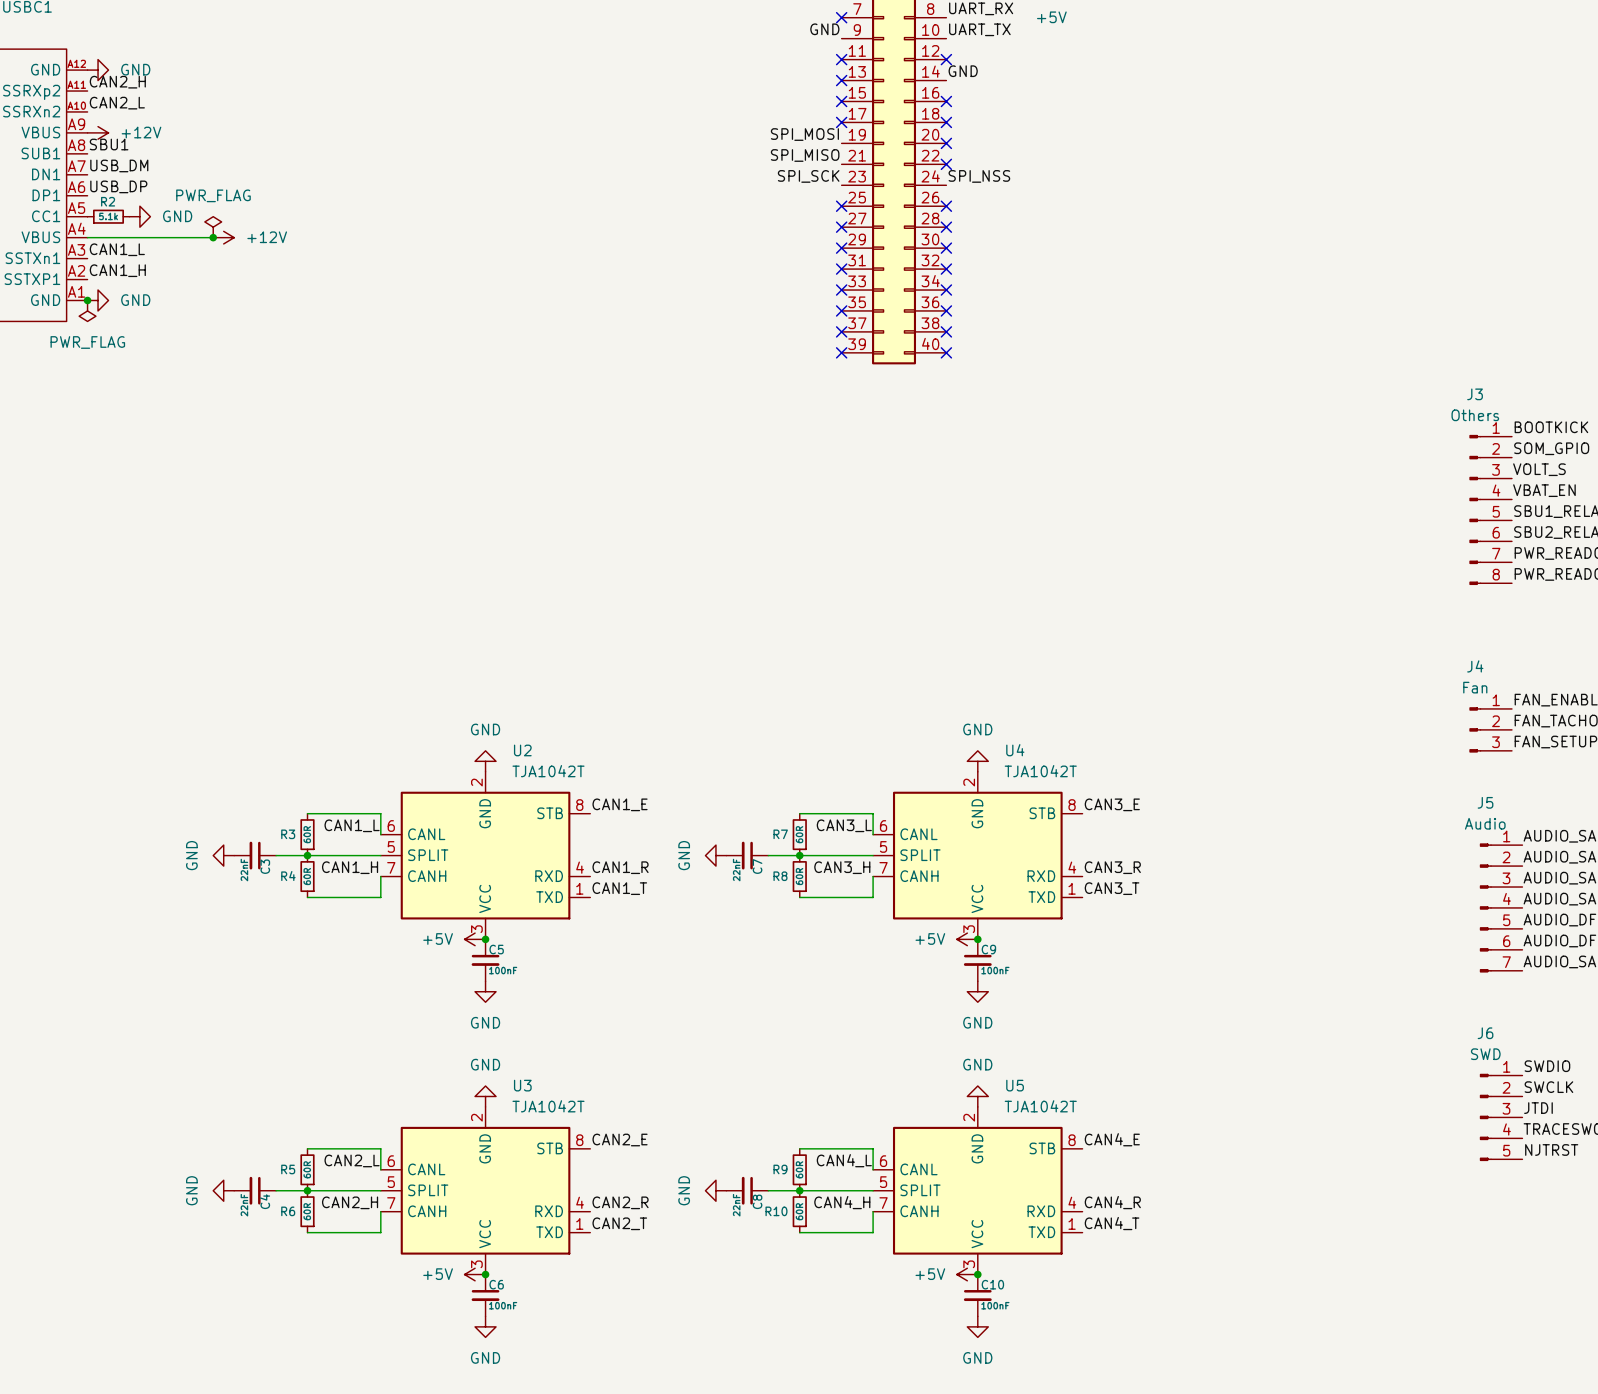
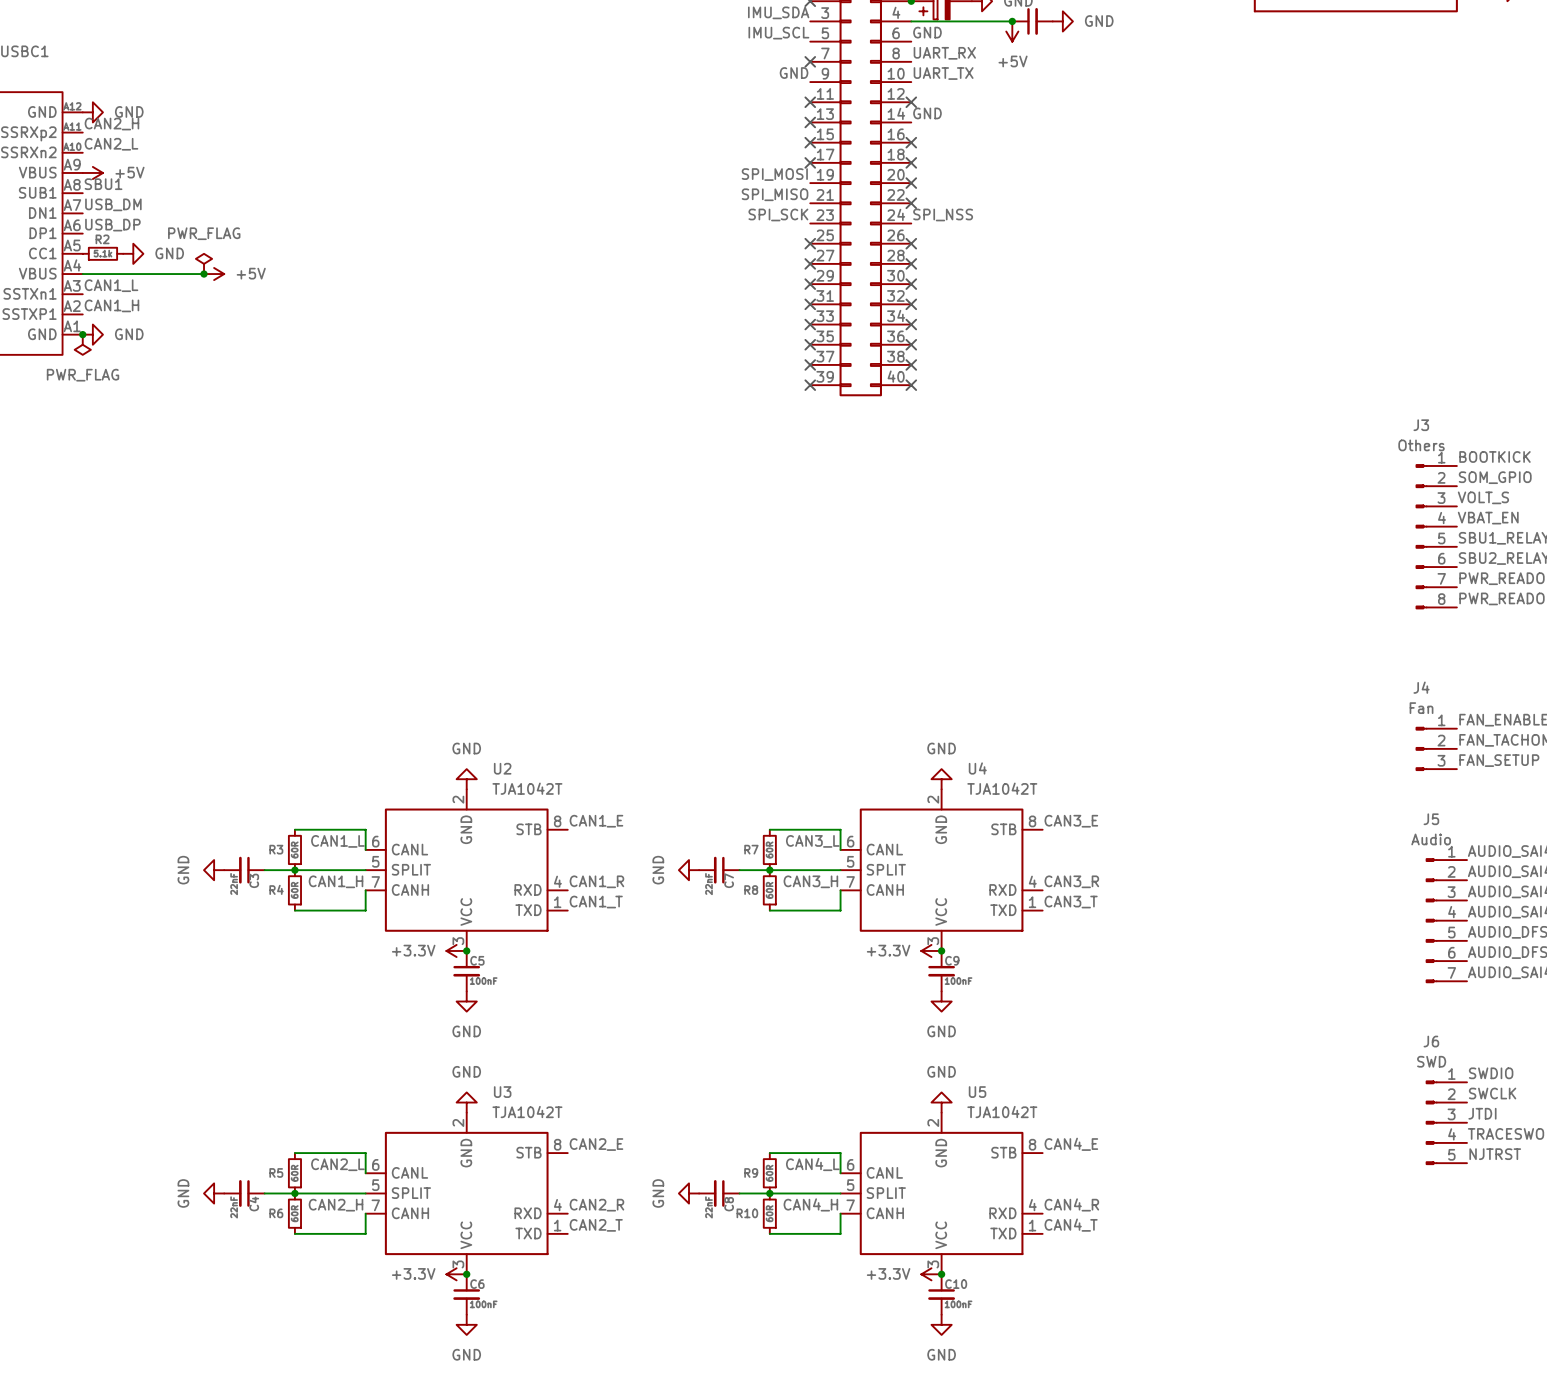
power symbol: +12V (98, 132) -> +5V (92, 172)
power symbol: +12V (223, 237) -> +5V (214, 274)
power symbol: +5V (475, 939) -> +3.3V (456, 950)
power symbol: +5V (967, 939) -> +3.3V (931, 950)
power symbol: +5V (475, 1274) -> +3.3V (456, 1274)
power symbol: +5V (967, 1274) -> +3.3V (931, 1274)

